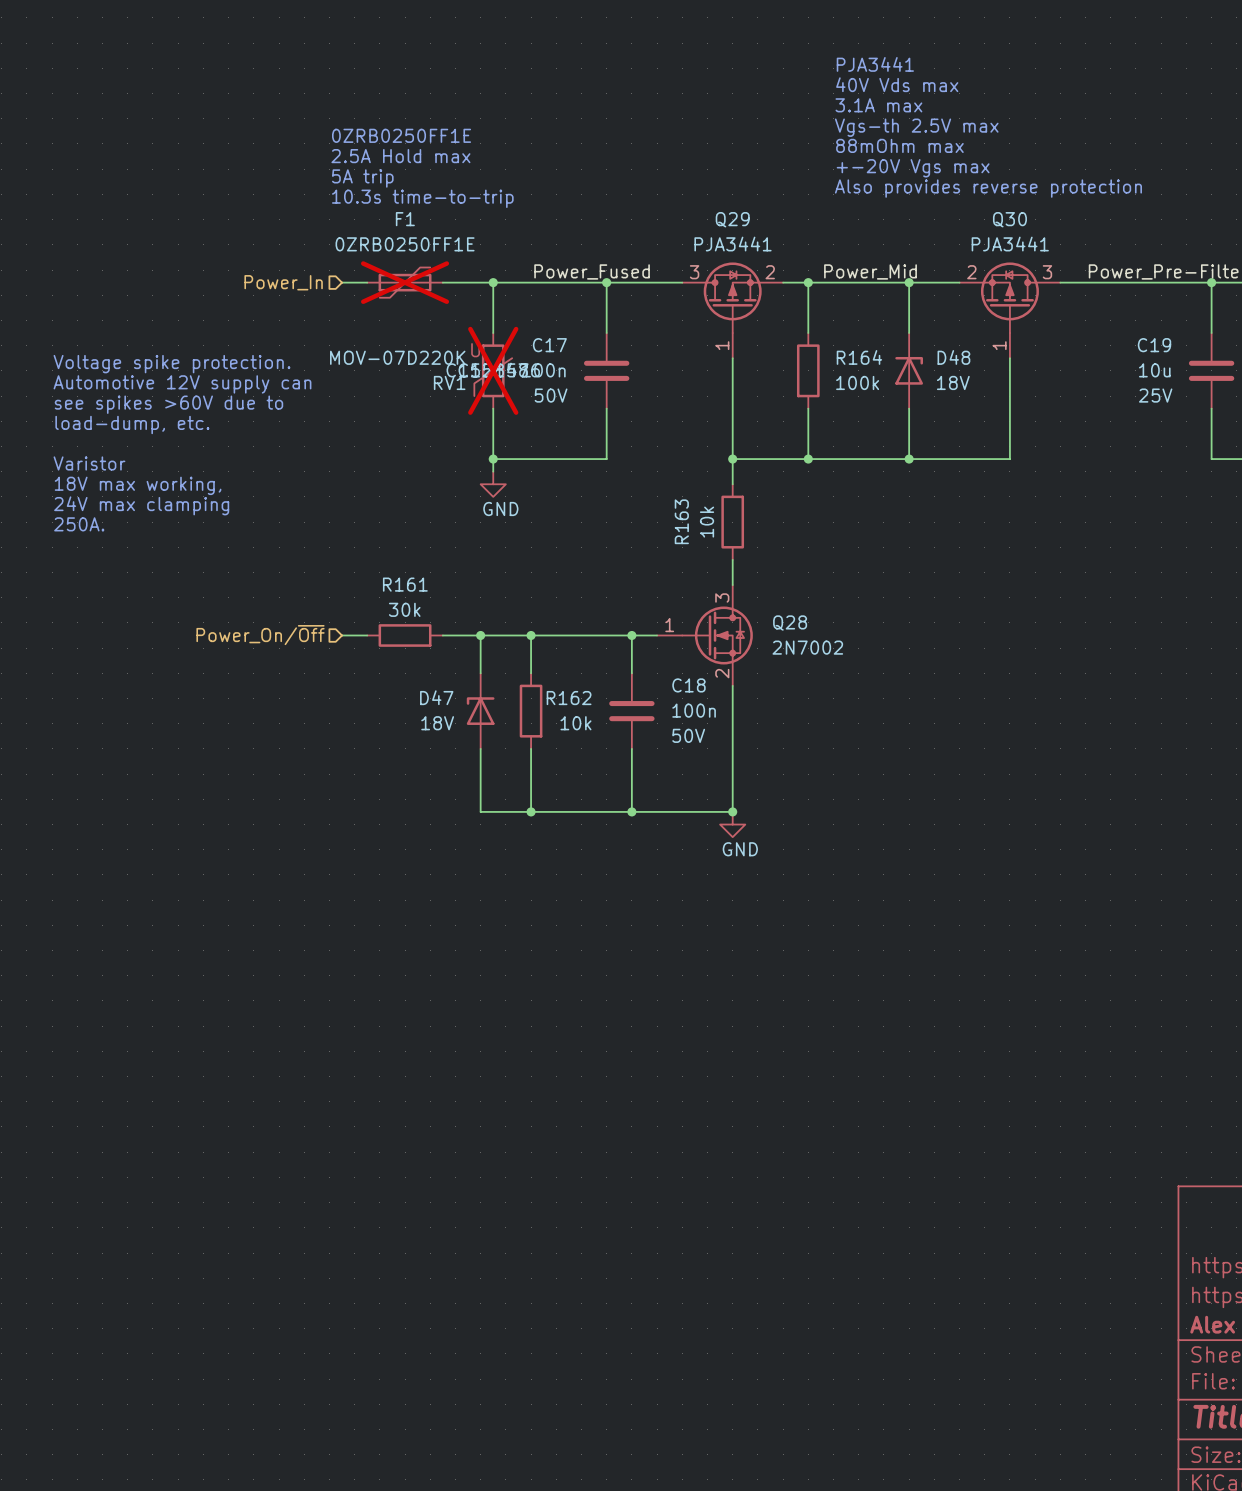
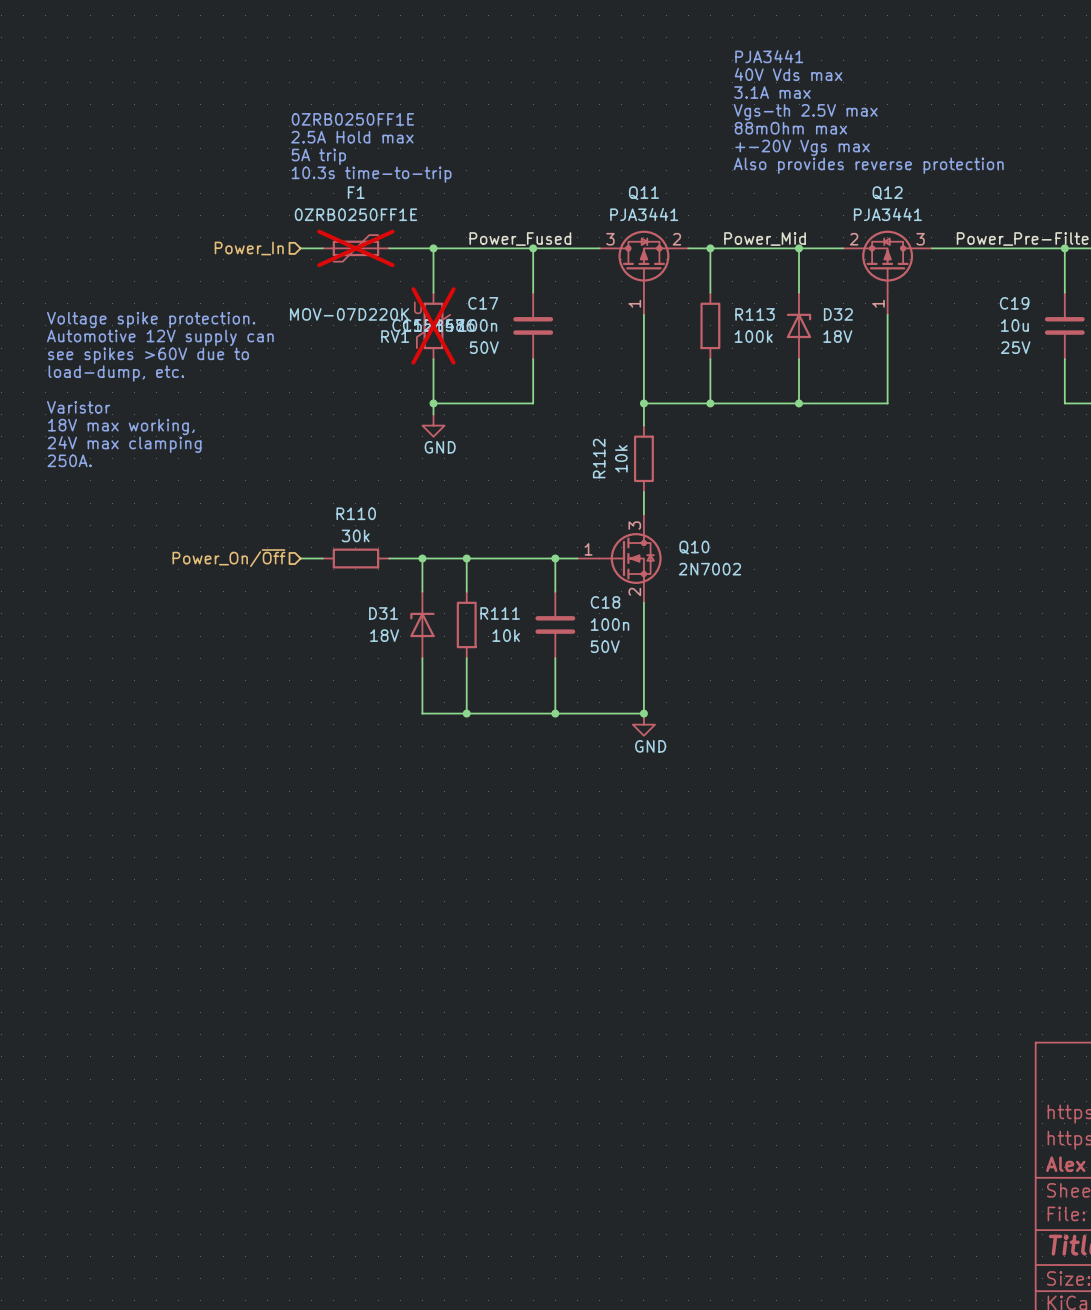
Q29 name: Q29 (732, 219) -> Q11 (643, 193)
Q30 name: Q30 (1009, 219) -> Q12 (887, 193)
R164 name: R164 (859, 357) -> R113 (755, 314)
D48 name: D48 (953, 357) -> D32 (838, 314)
R163 name: R163 (681, 521) -> R112 (599, 458)
R161 name: R161 (405, 584) -> R110 (356, 513)
Q28 name: Q28 (790, 623) -> Q10 (694, 547)
D47 name: D47 (436, 697) -> D31 (383, 613)
R162 name: R162 (569, 698) -> R111 (500, 613)

